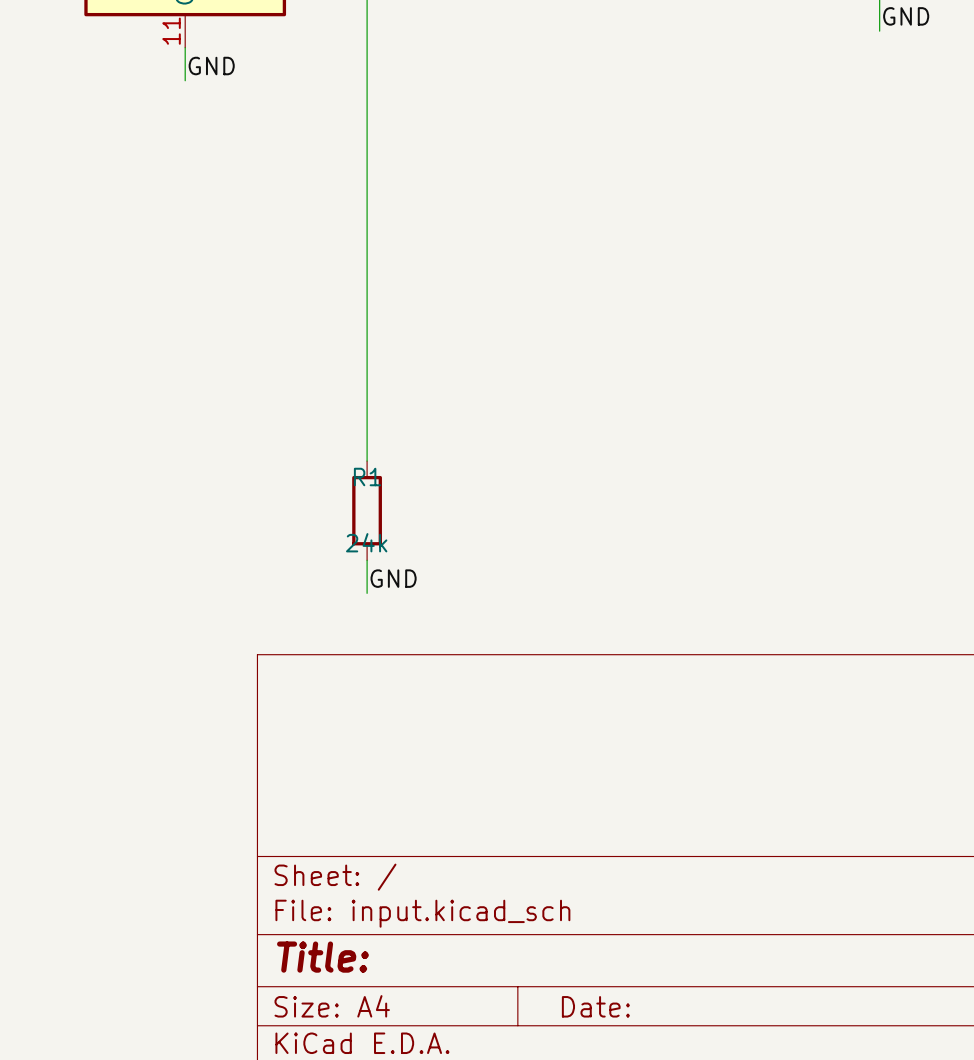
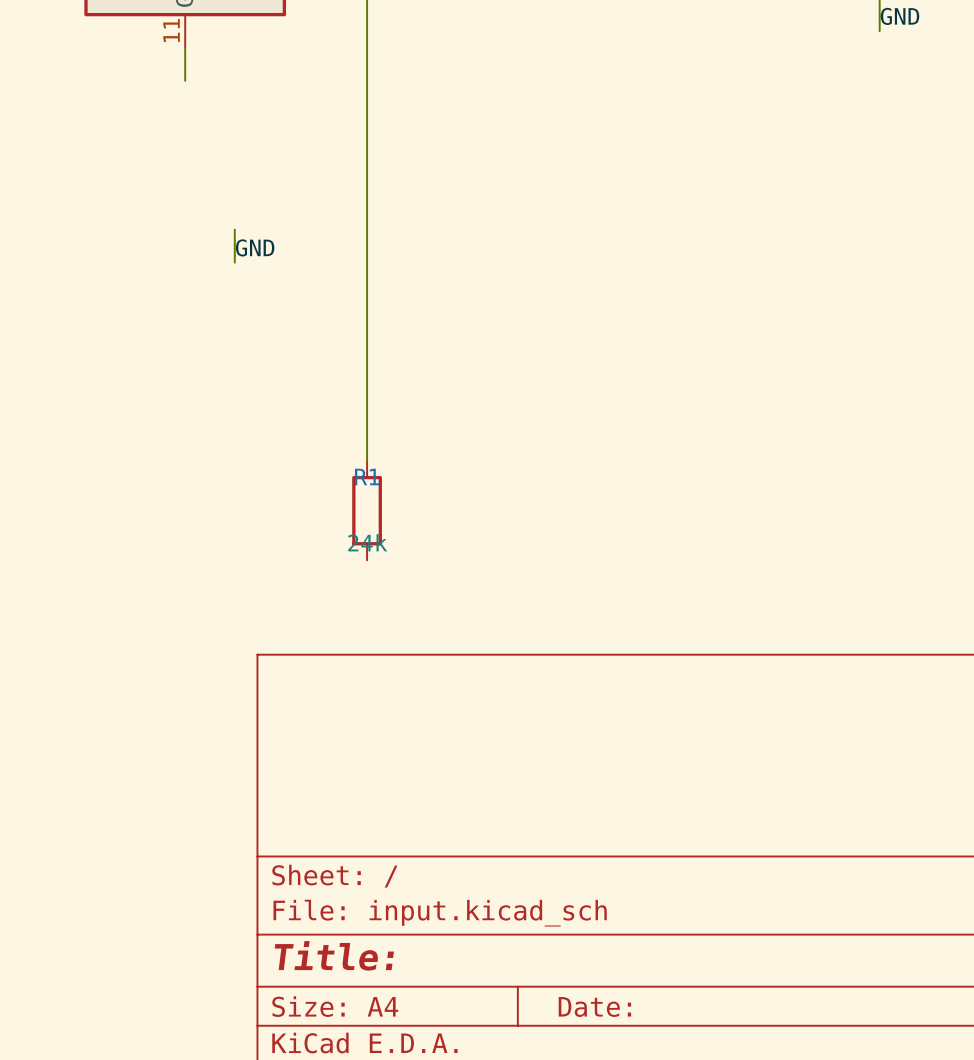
label: GND (211, 66) -> none
wire: none -> (234, 229) (234, 262)
label: none -> GND (255, 247)
wire: (367, 560) (367, 593) -> none
label: GND (393, 578) -> none

